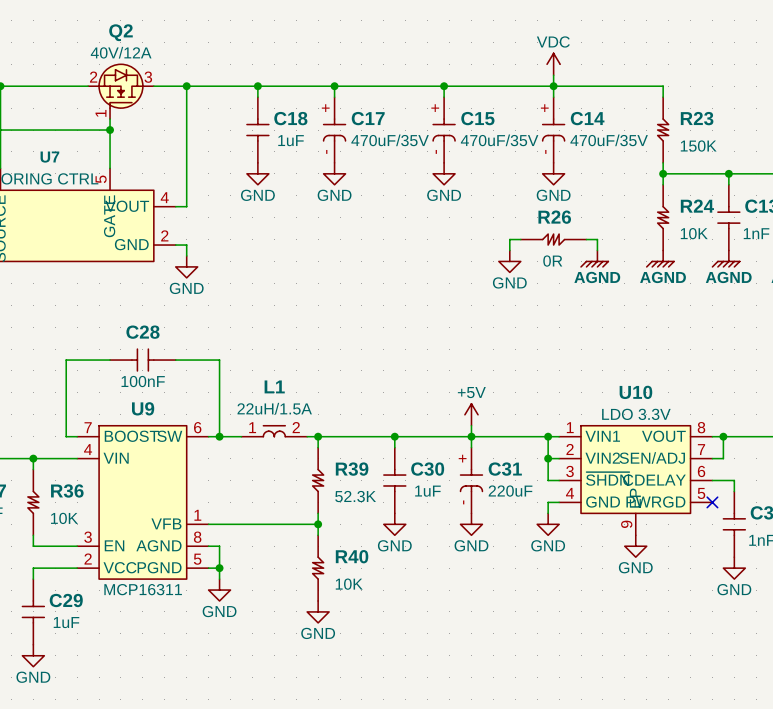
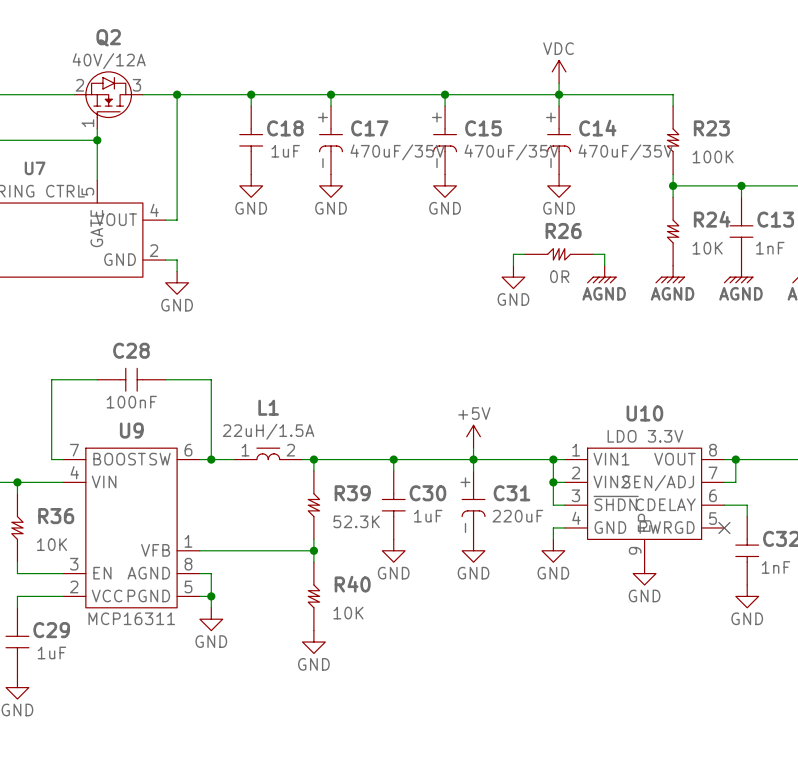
R23 value: 150K (698, 146) -> 100K (713, 156)

